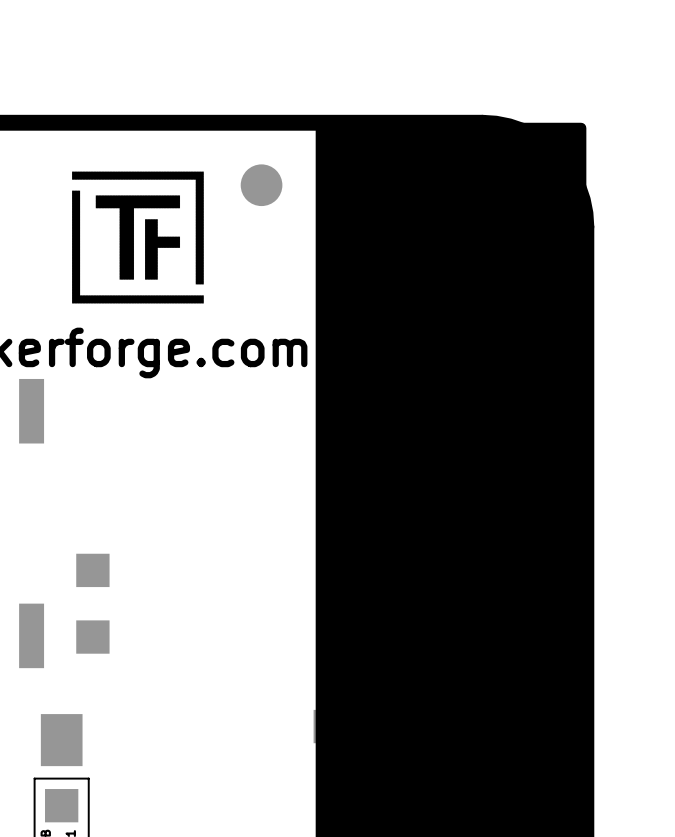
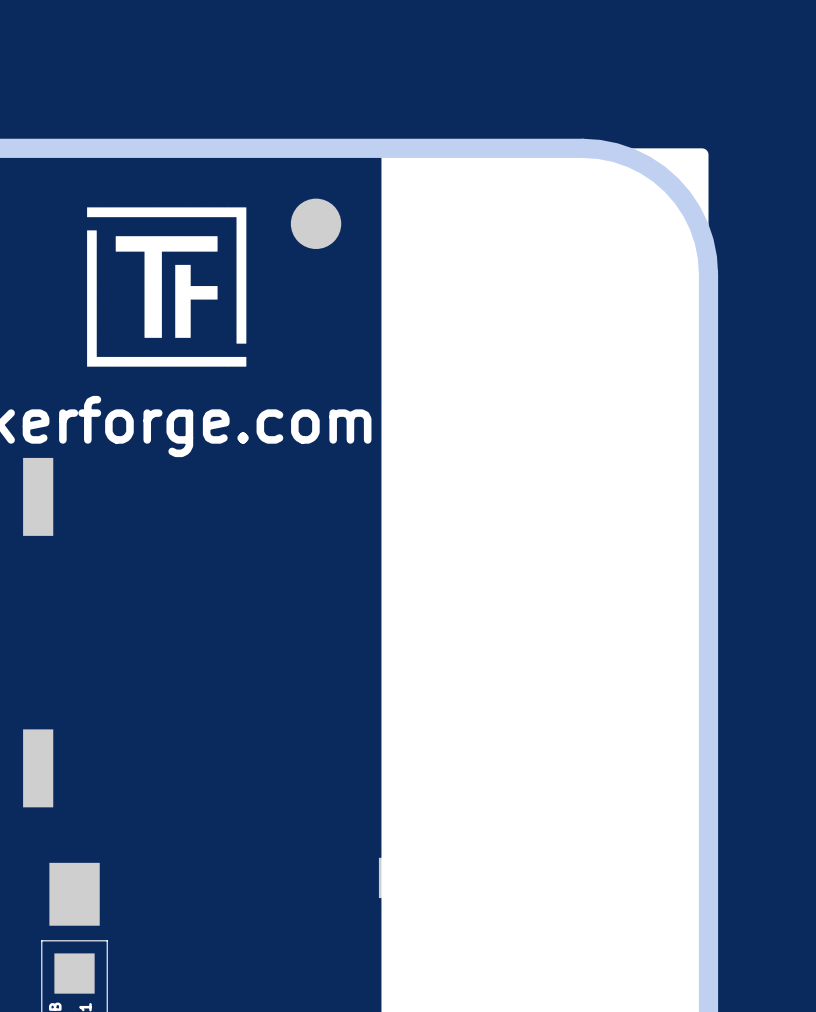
part: (92, 603) -> none

